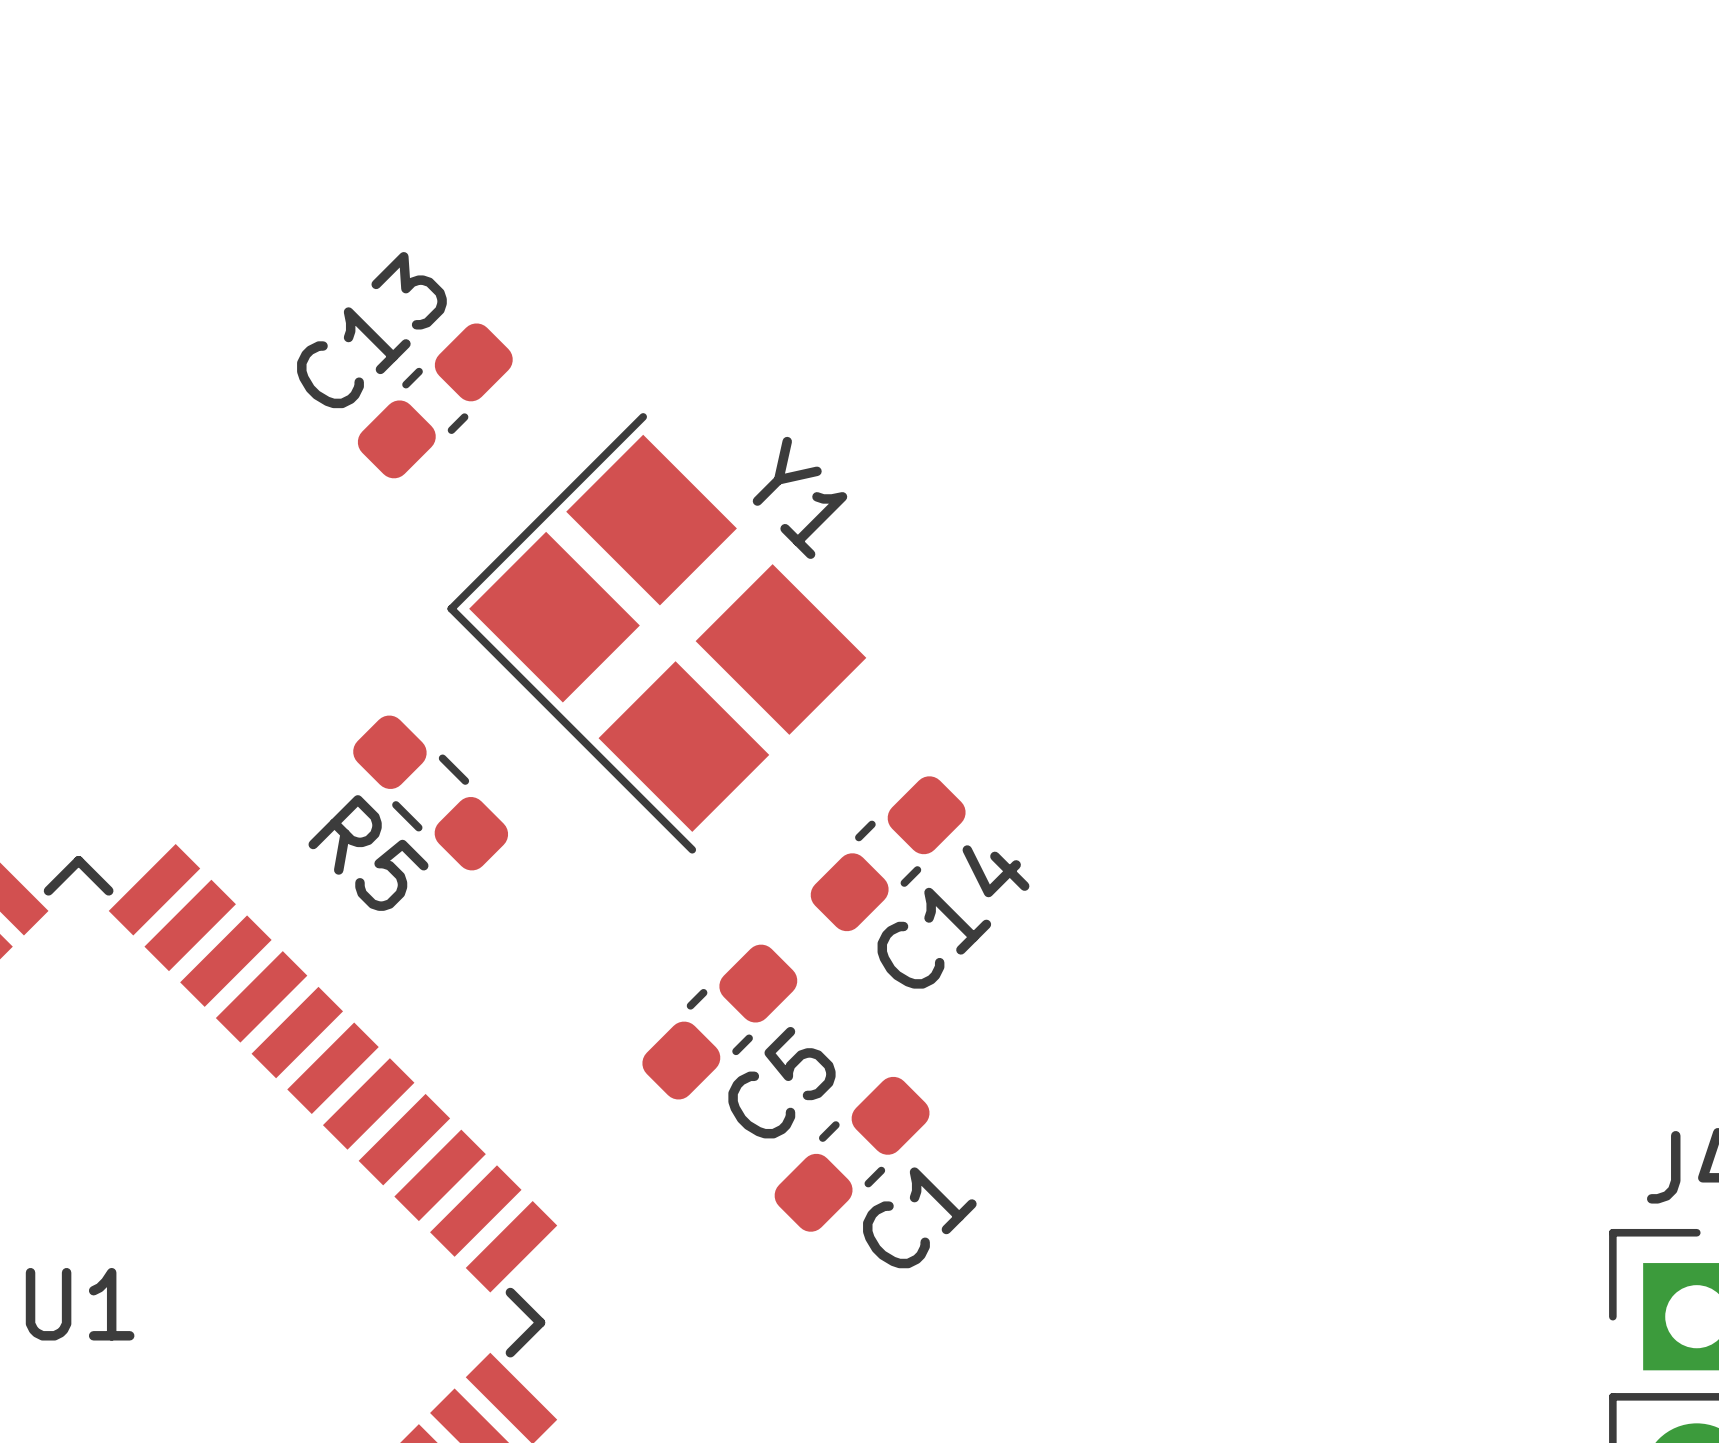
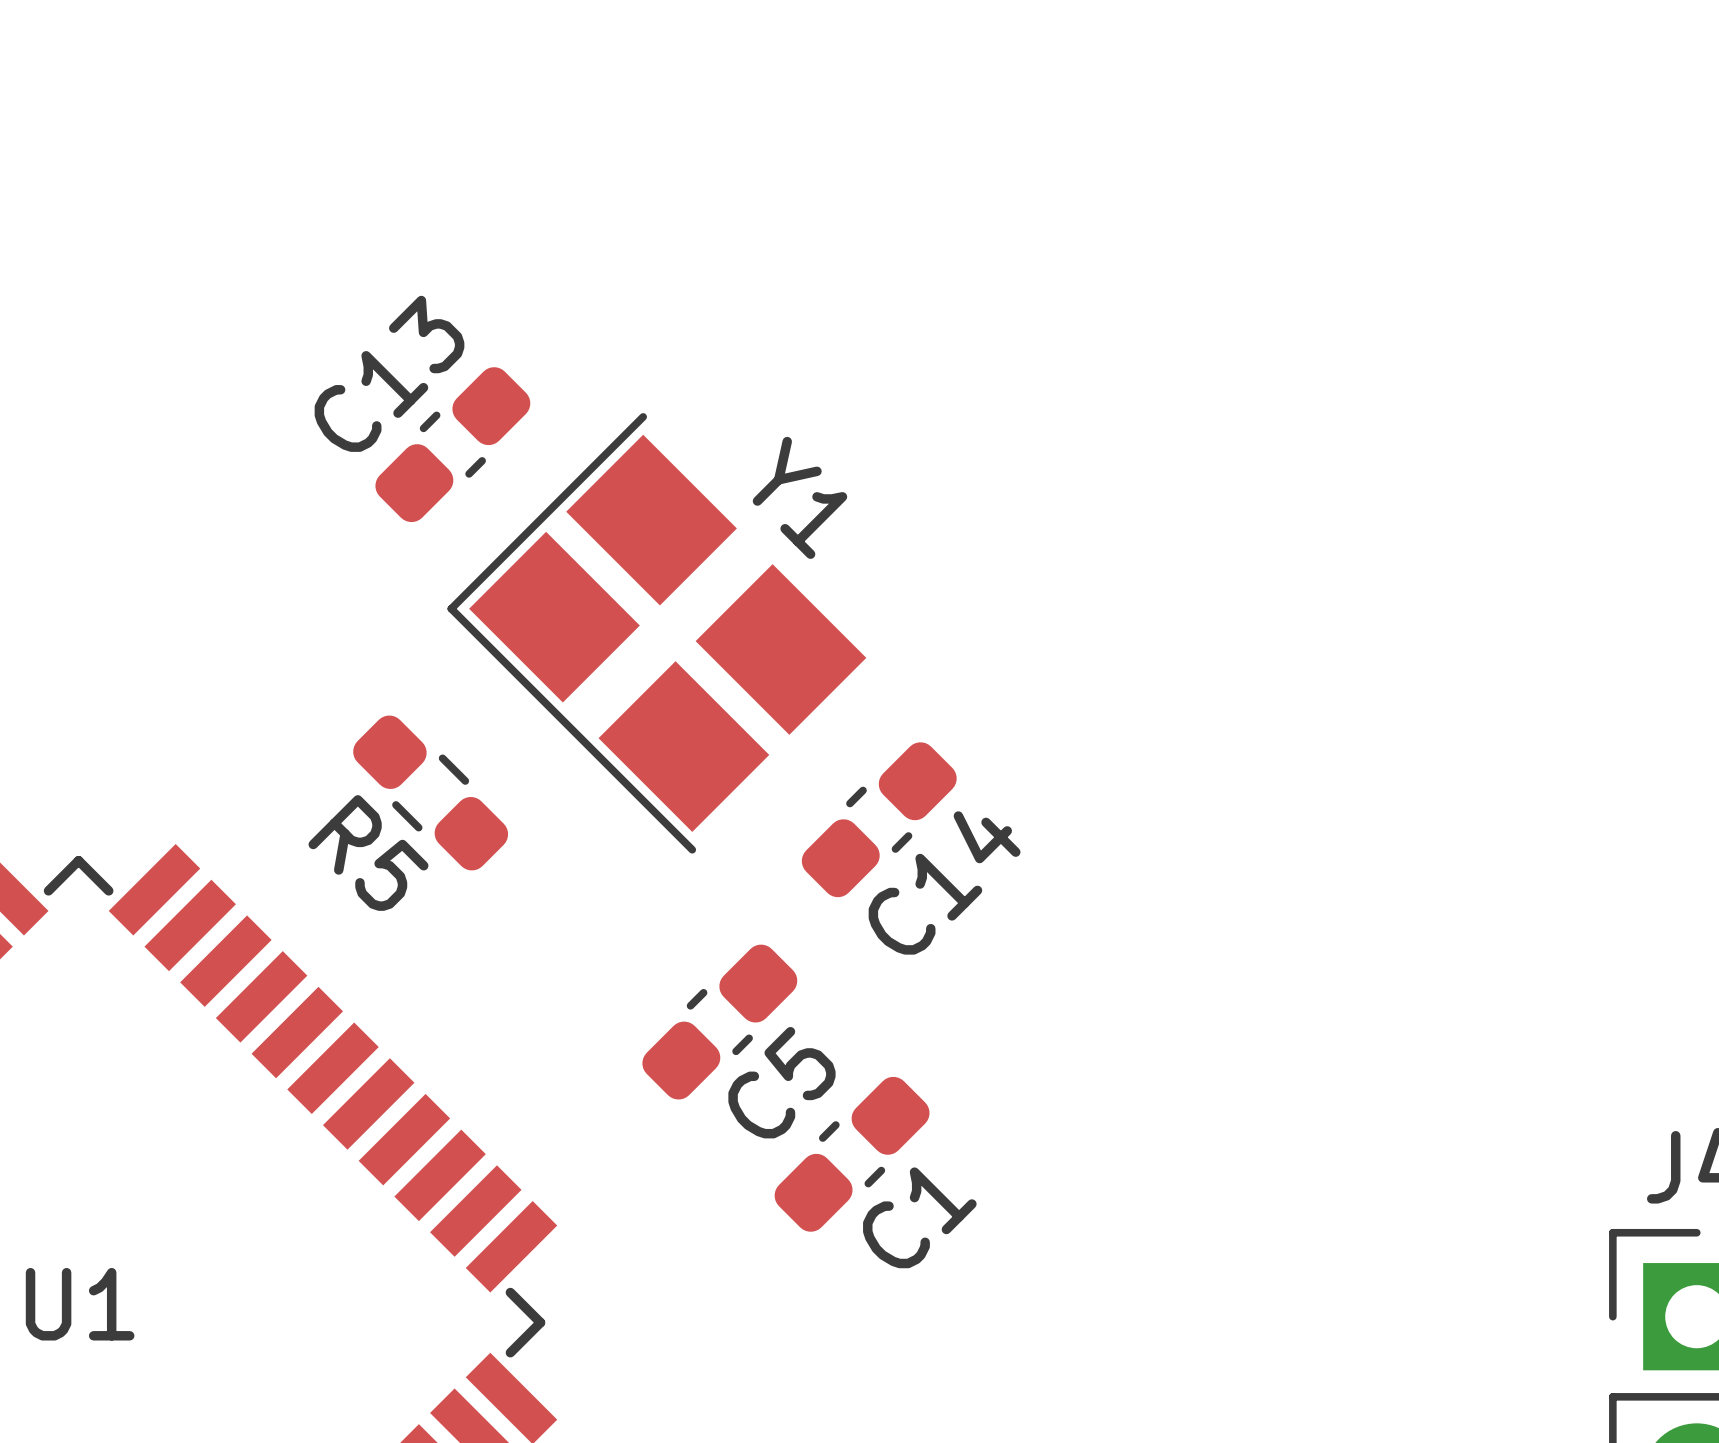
C13 position: (435, 400) -> (452, 444)
C14 position: (888, 853) -> (879, 819)

